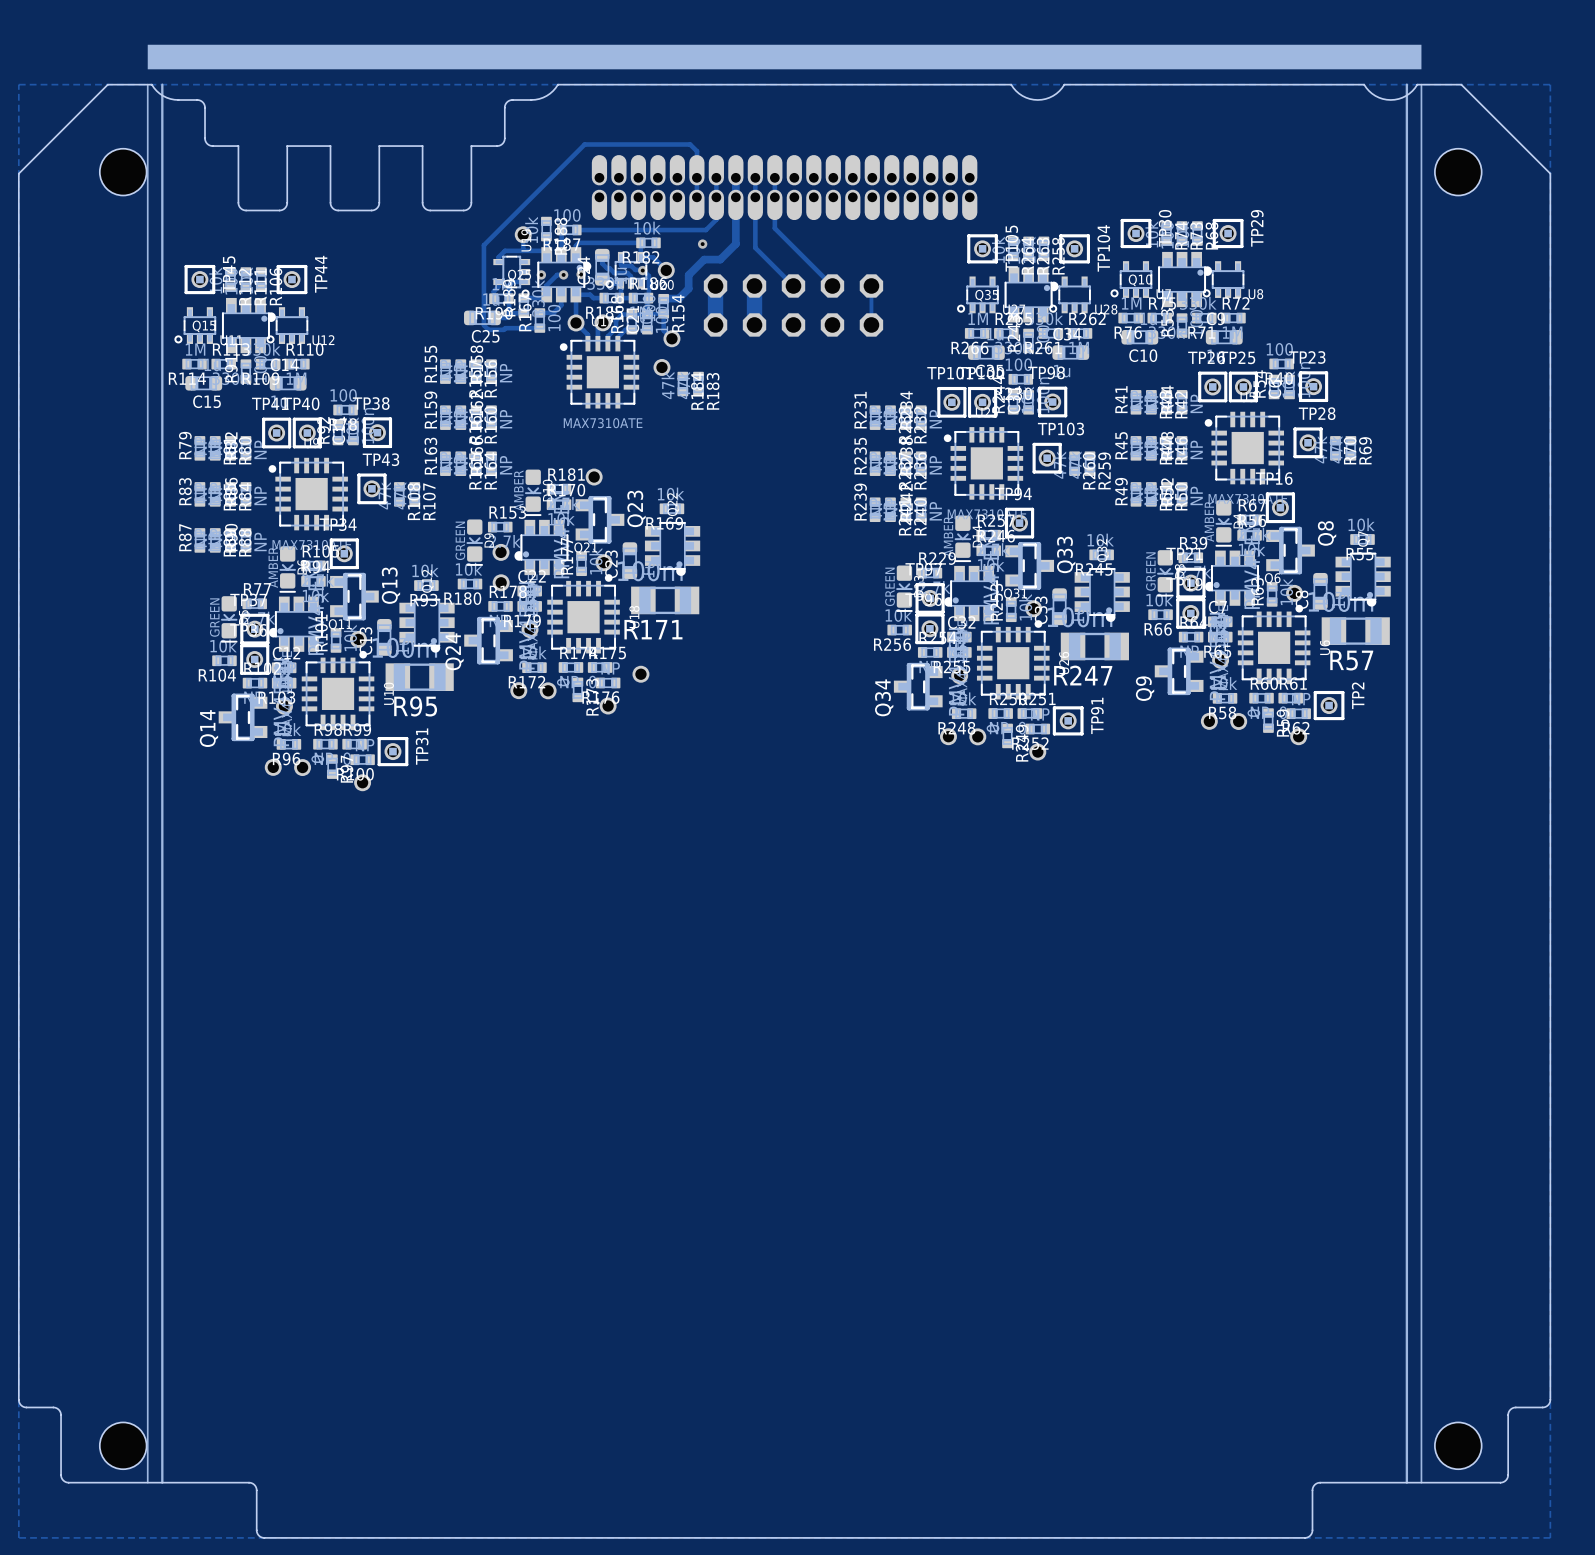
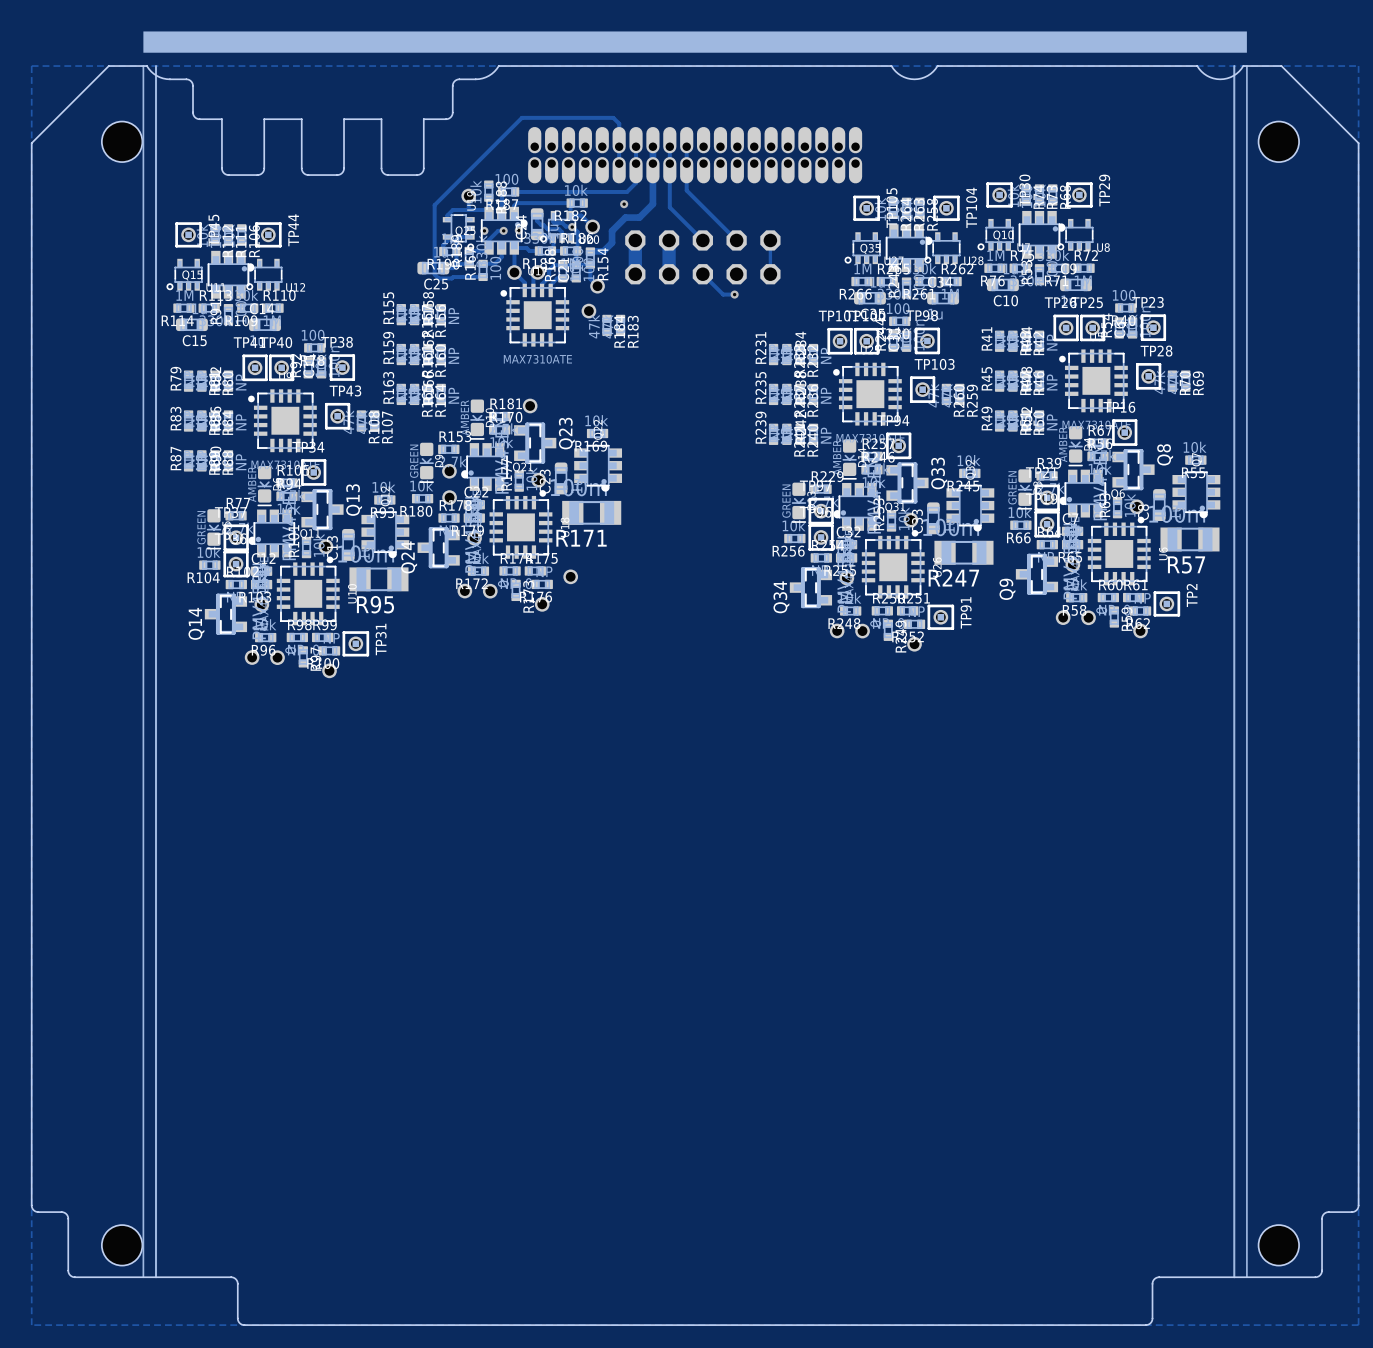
track: none -> (702, 274) (723, 294) (734, 294)
via: none -> (734, 294)

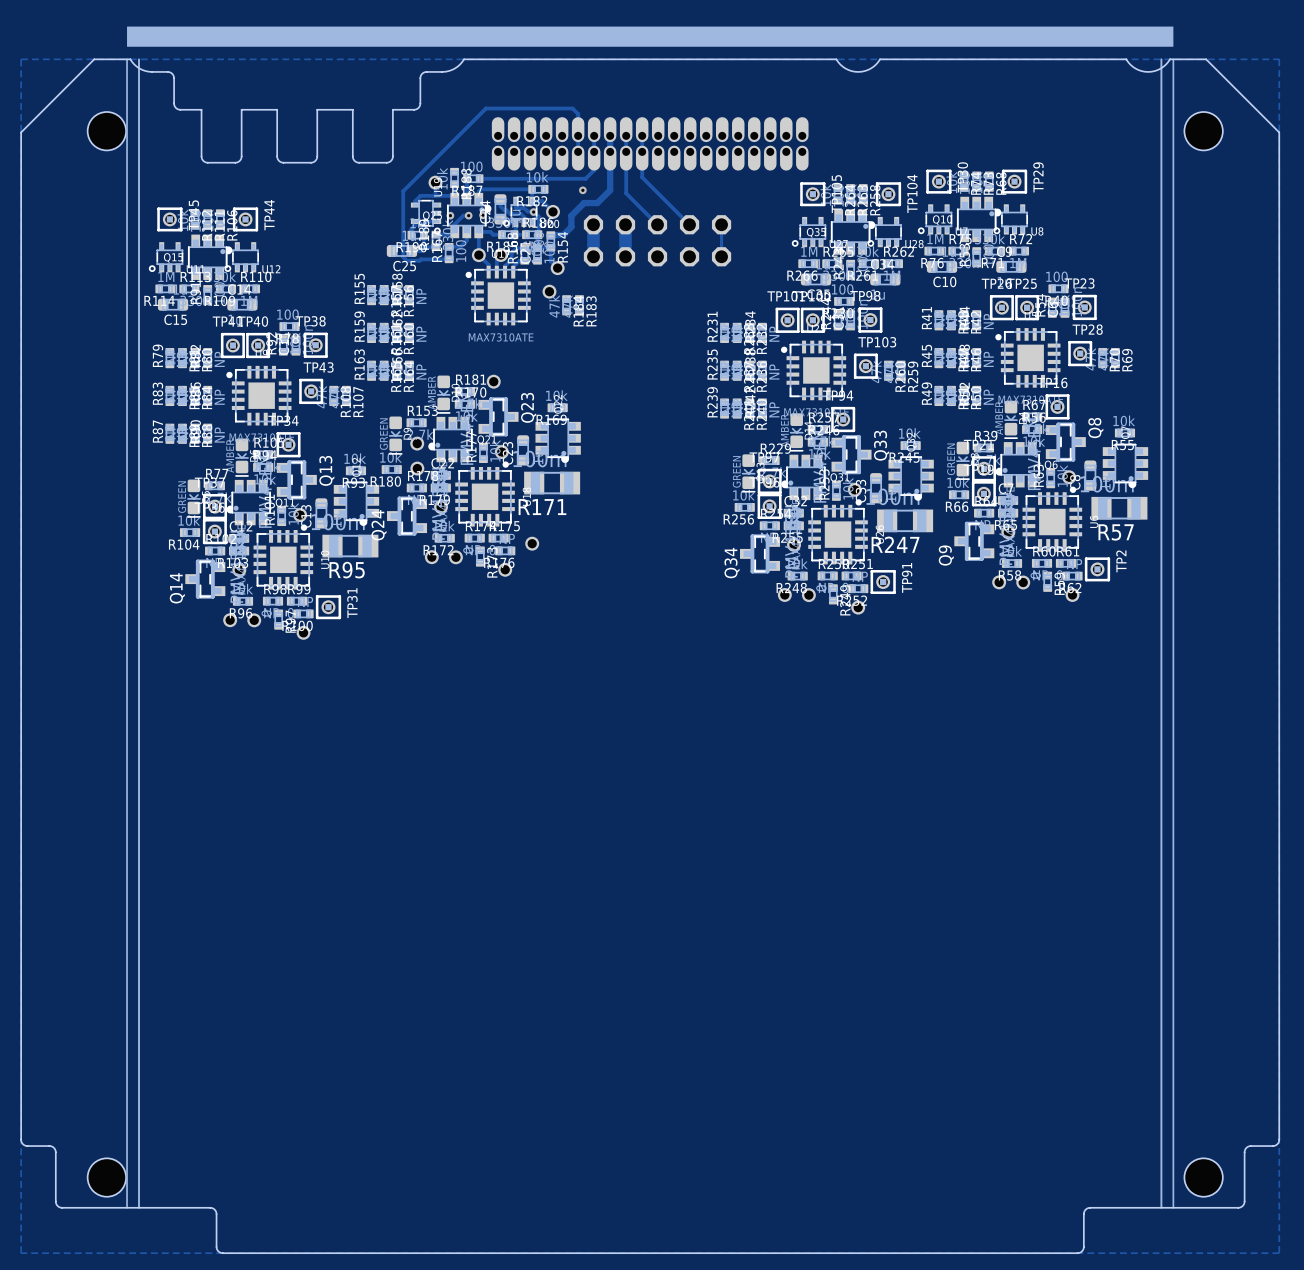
track: (702, 274) (723, 294) (734, 294) -> none
via: (734, 294) -> none

